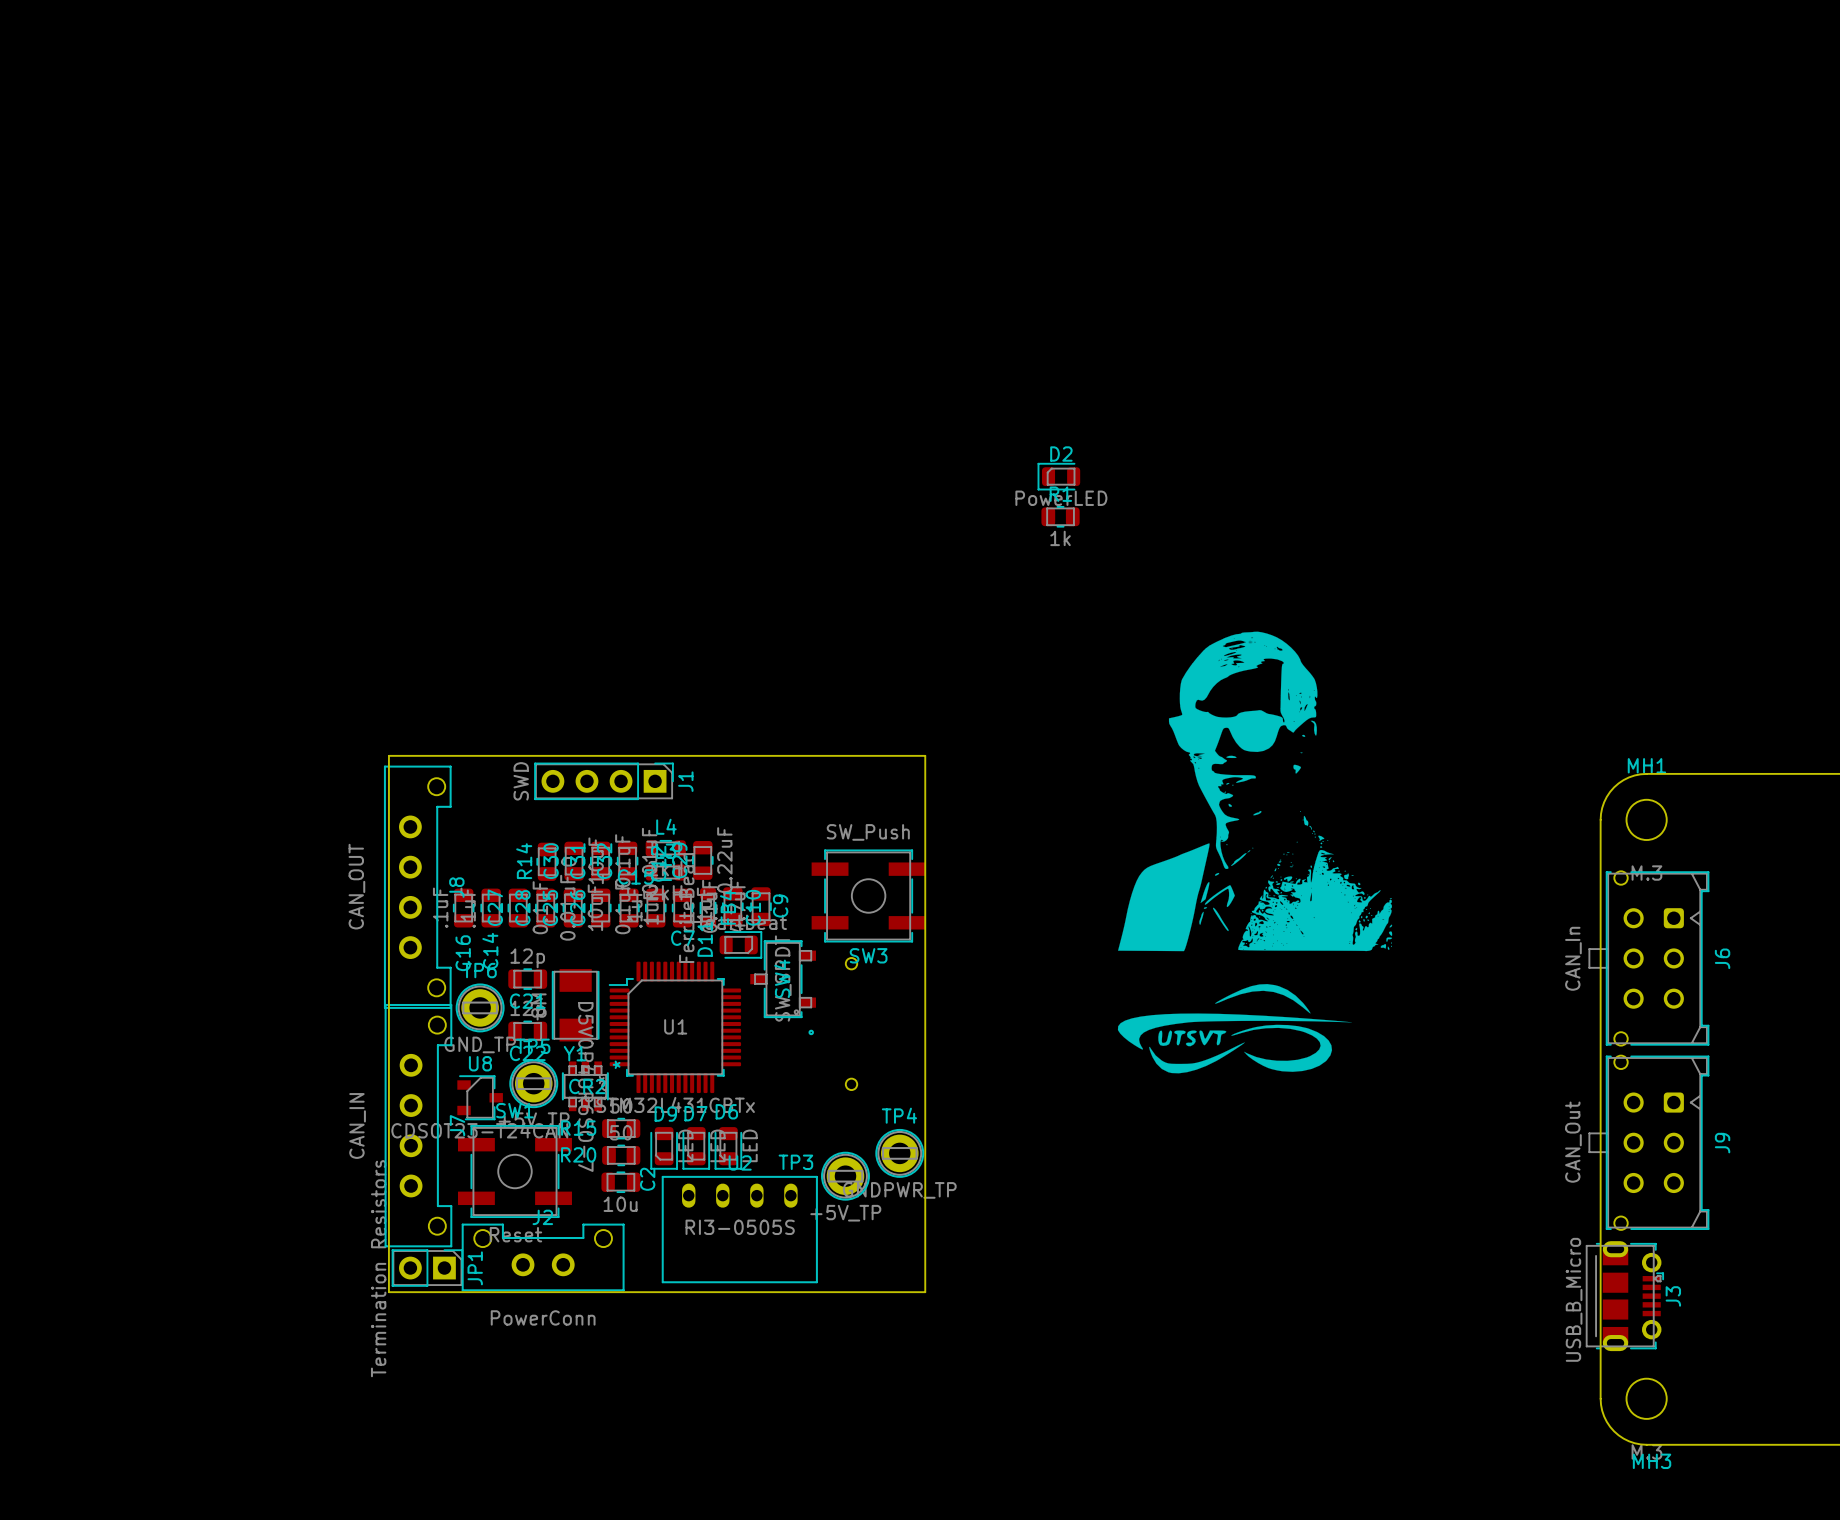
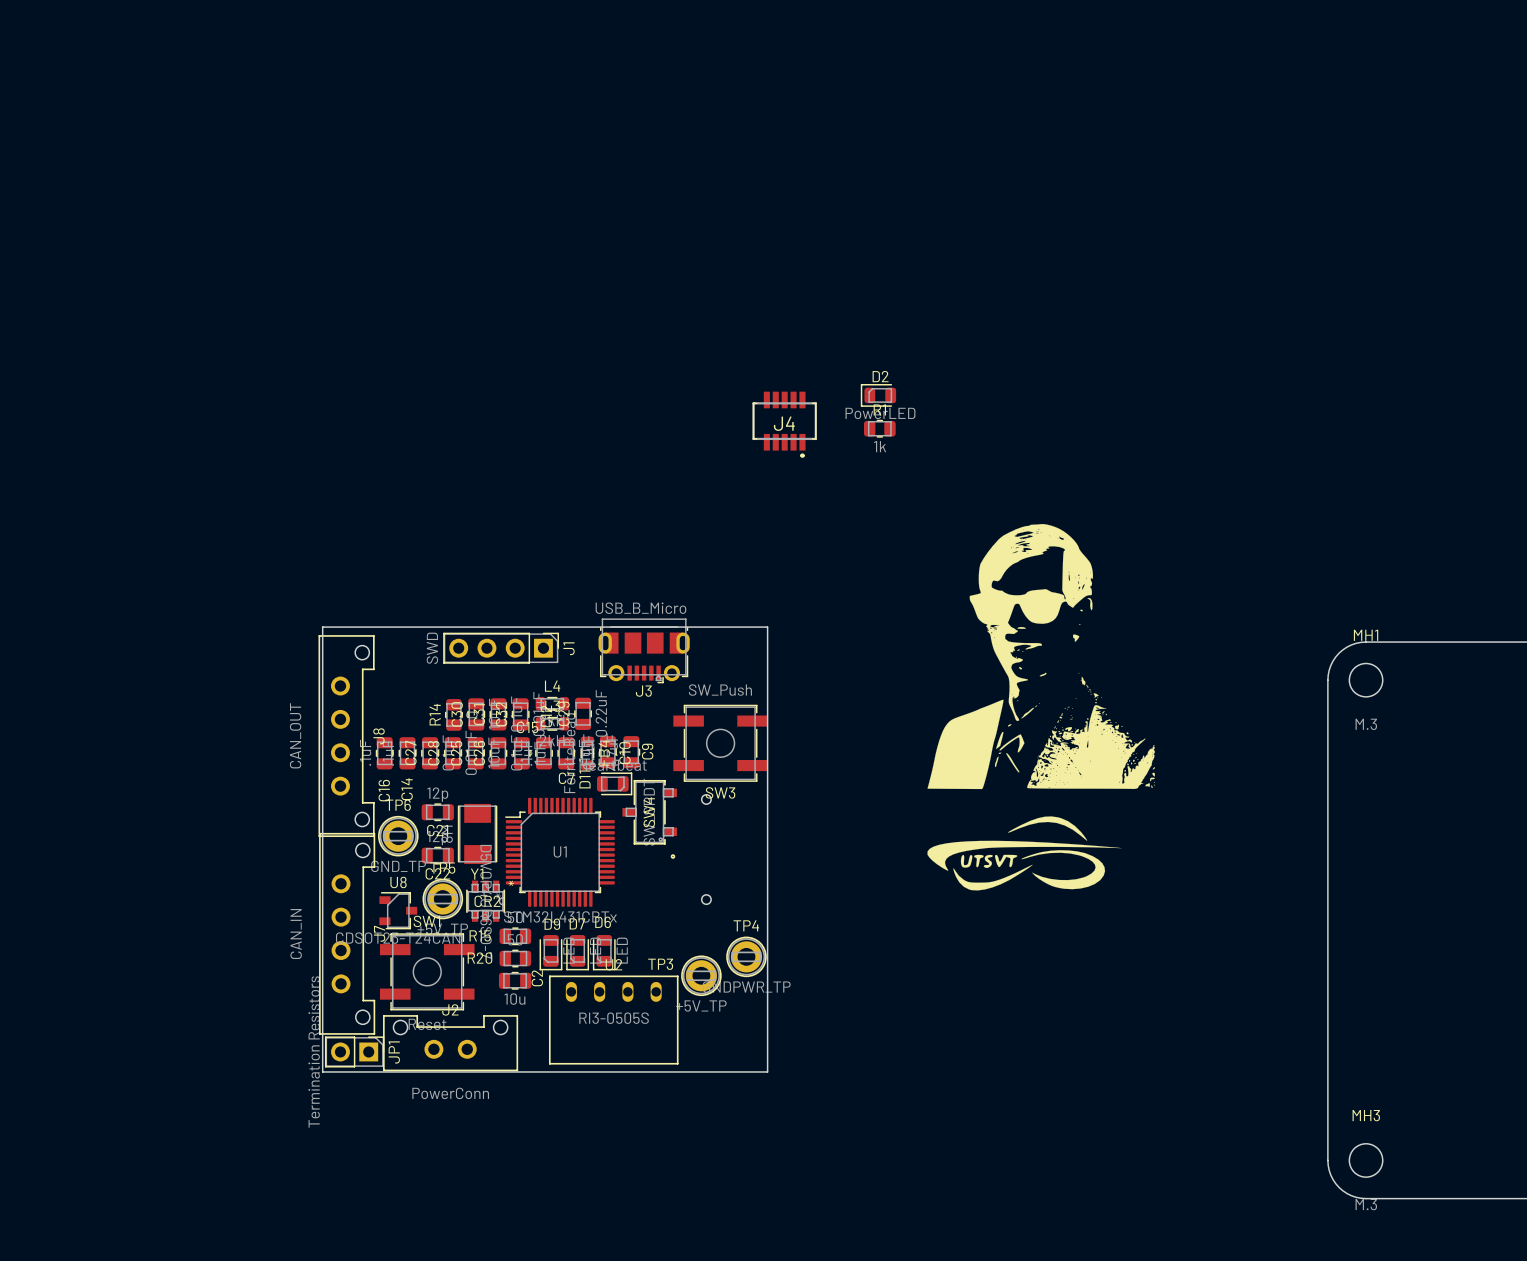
J4: none -> (784, 424)
J6: CAN_In (1648, 958) -> none
J9: CAN_Out (1648, 1142) -> none
J3 rotation: 0° (1624, 1296) -> 90° clockwise (644, 650)
J3 position: (1624, 1296) -> (644, 650)
MH3 name position: MH3 (1652, 1461) -> MH3 (1366, 1115)

